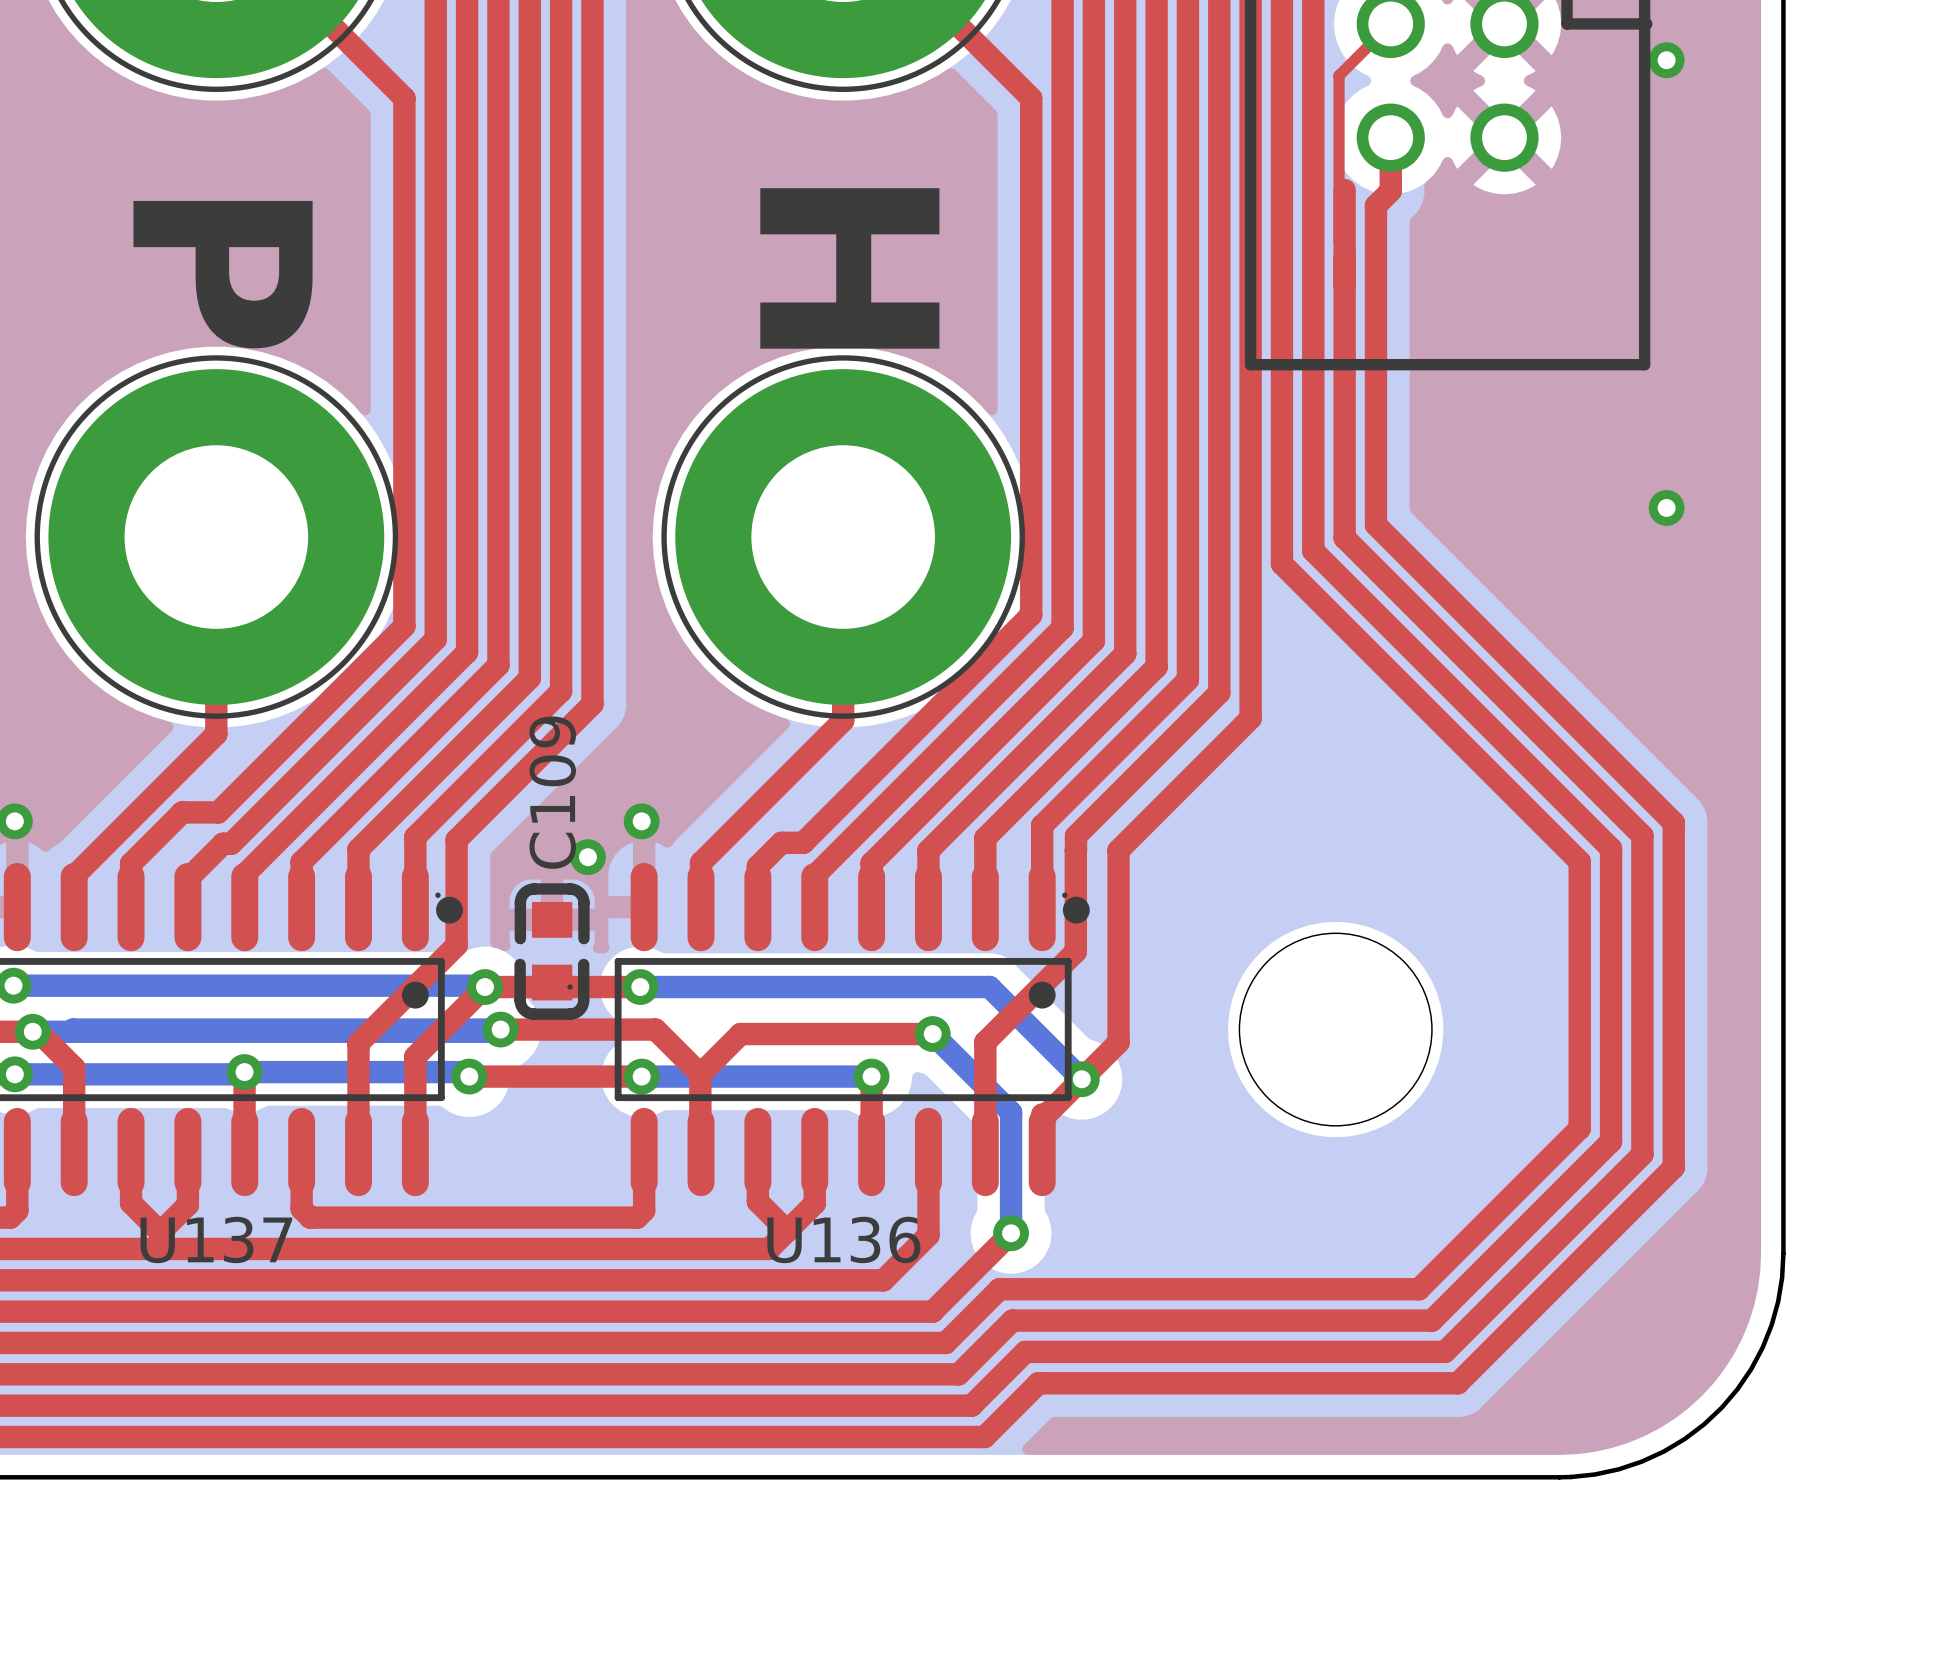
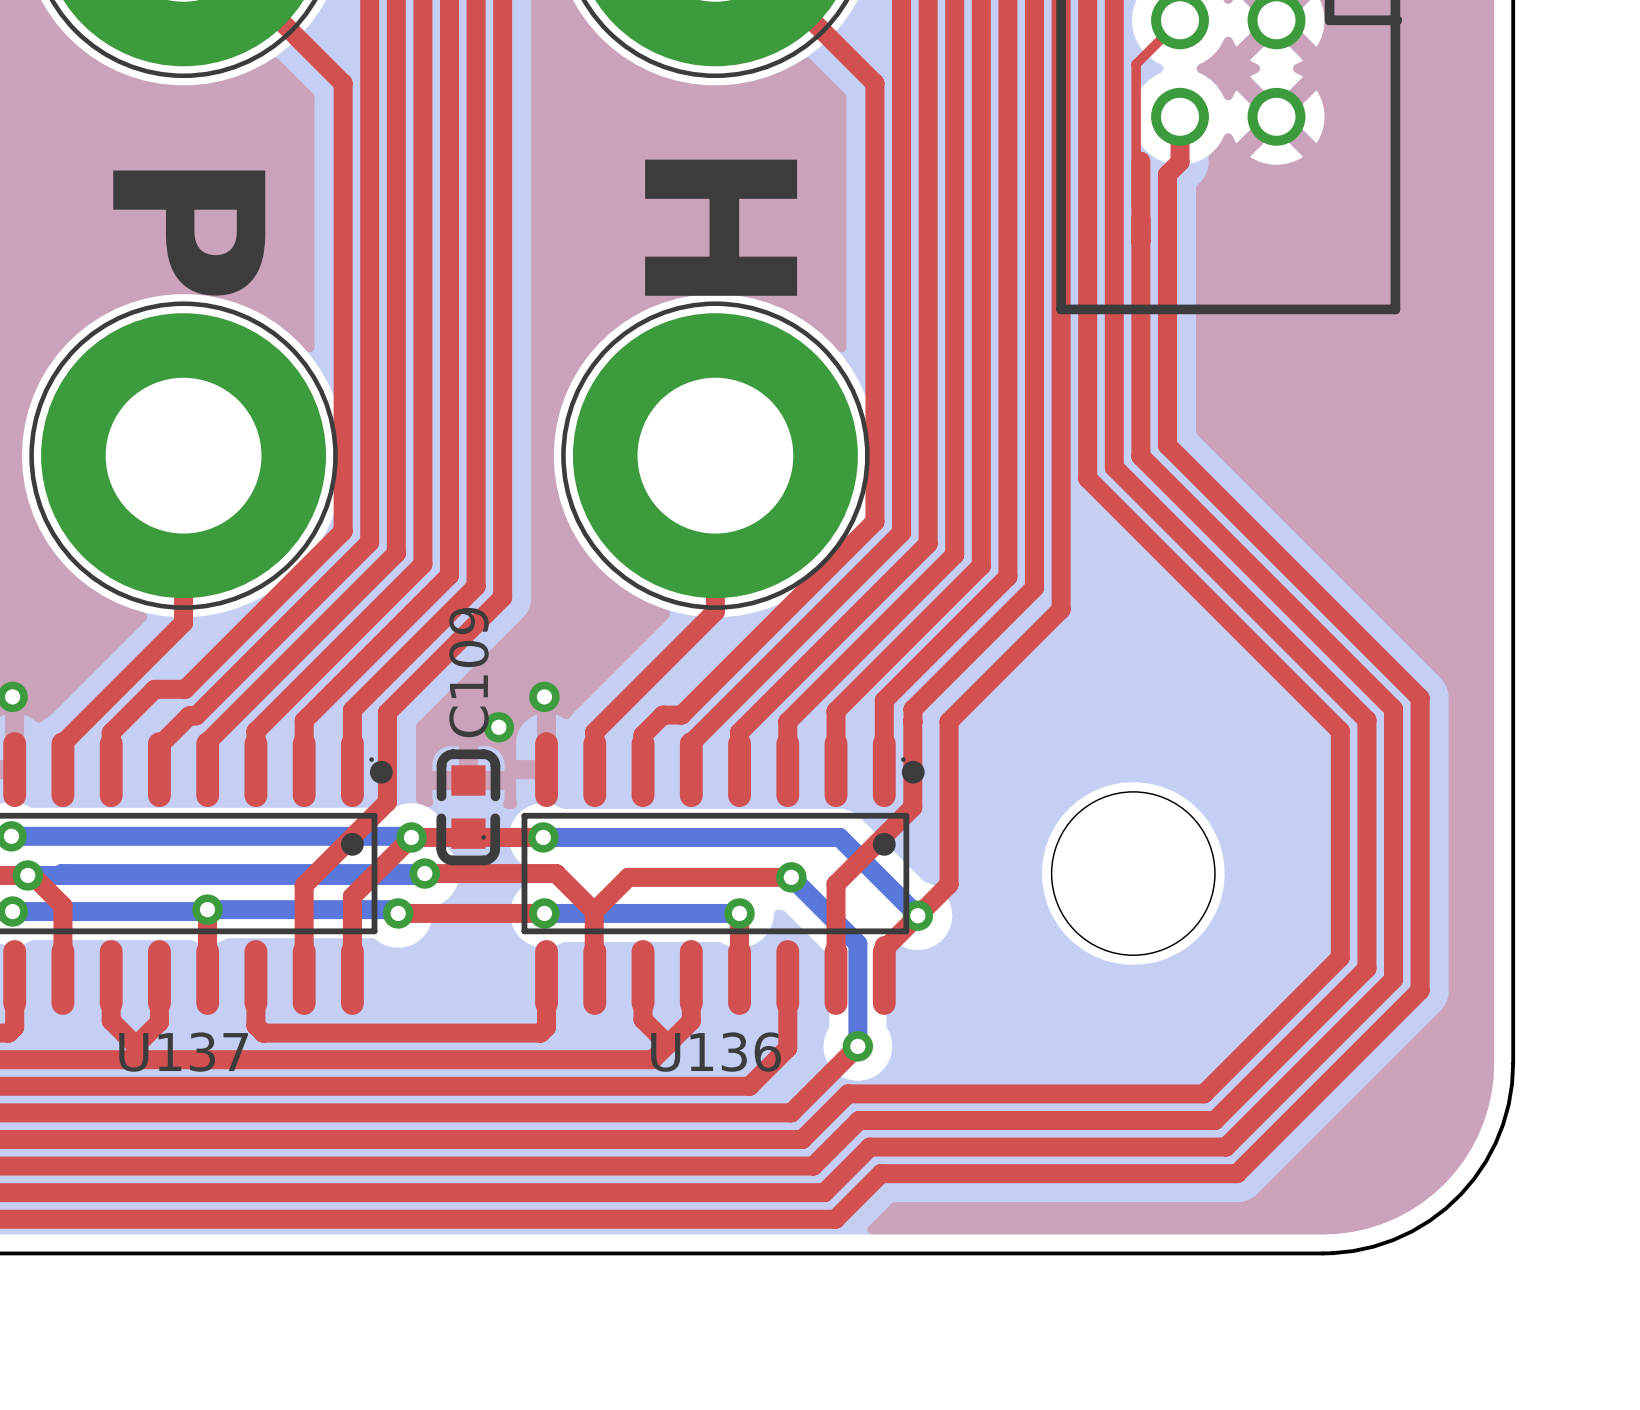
via: (1666, 60) -> none
via: (1666, 507) -> none

